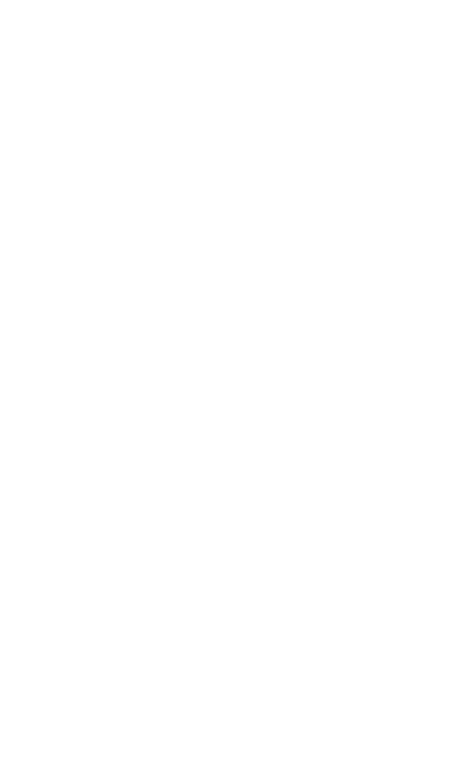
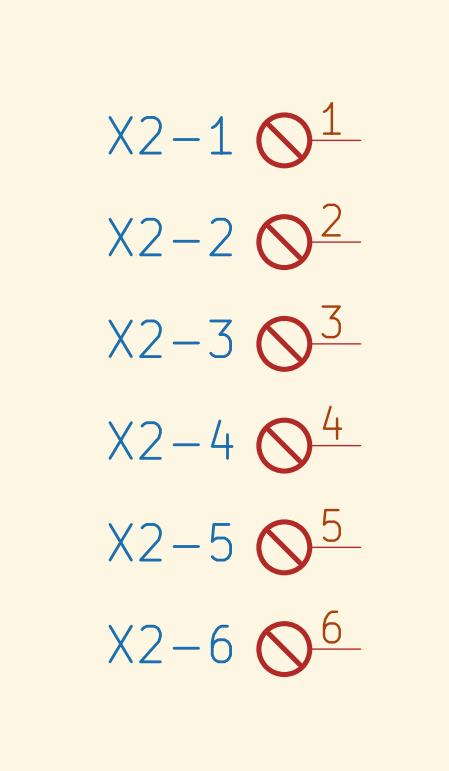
X2-1: none -> (308, 140)
X2-2: none -> (308, 242)
X2-3: none -> (308, 343)
X2-4: none -> (308, 445)
X2-5: none -> (308, 547)
X2-6: none -> (308, 649)

